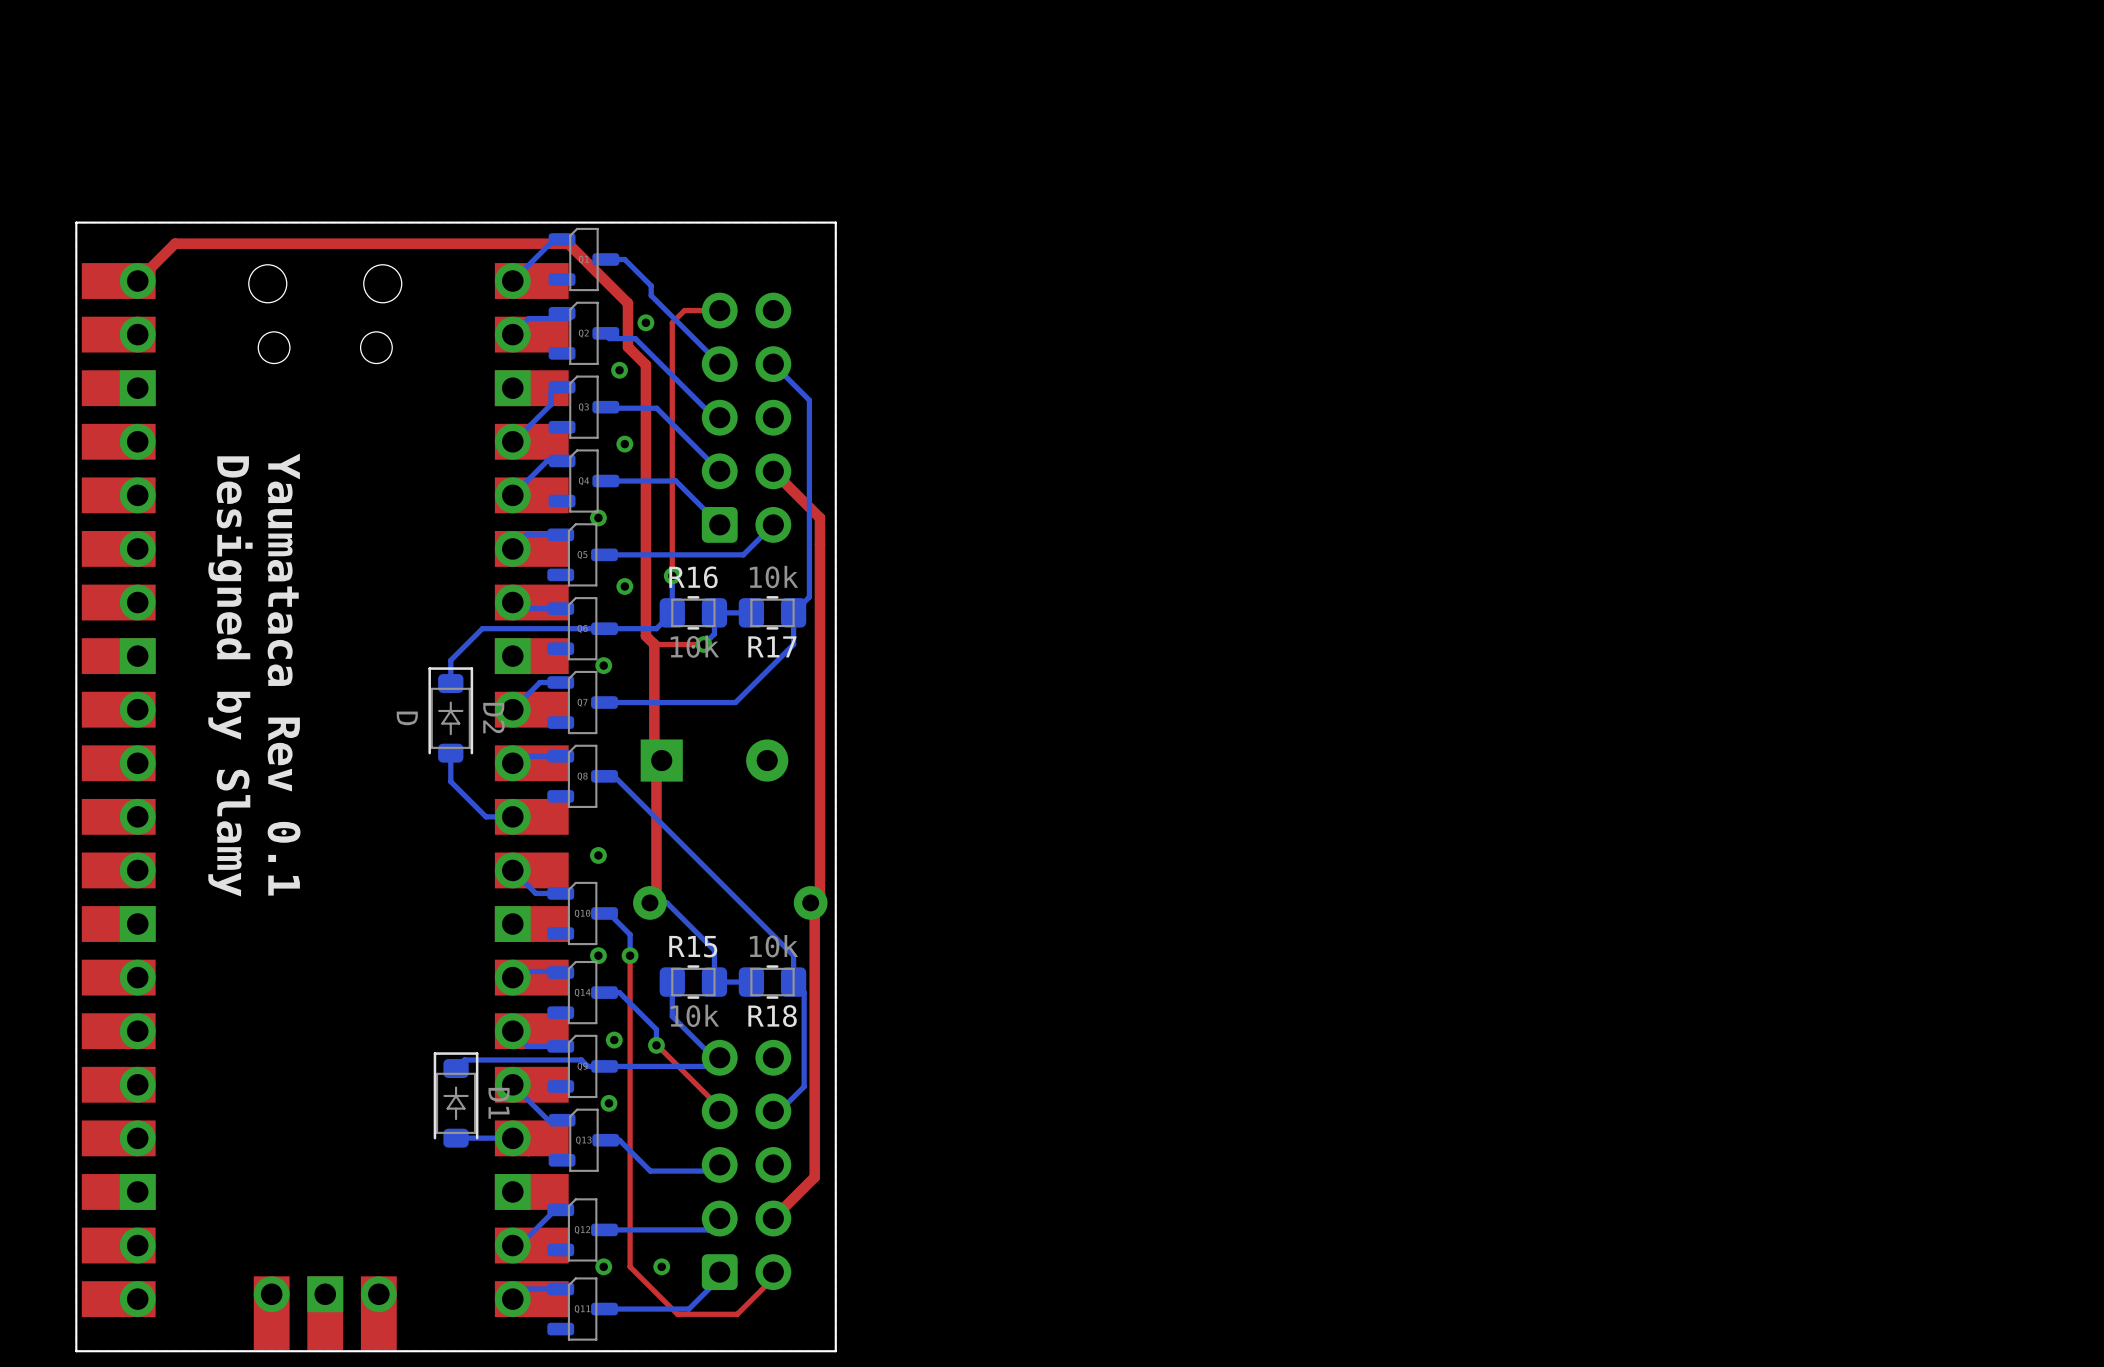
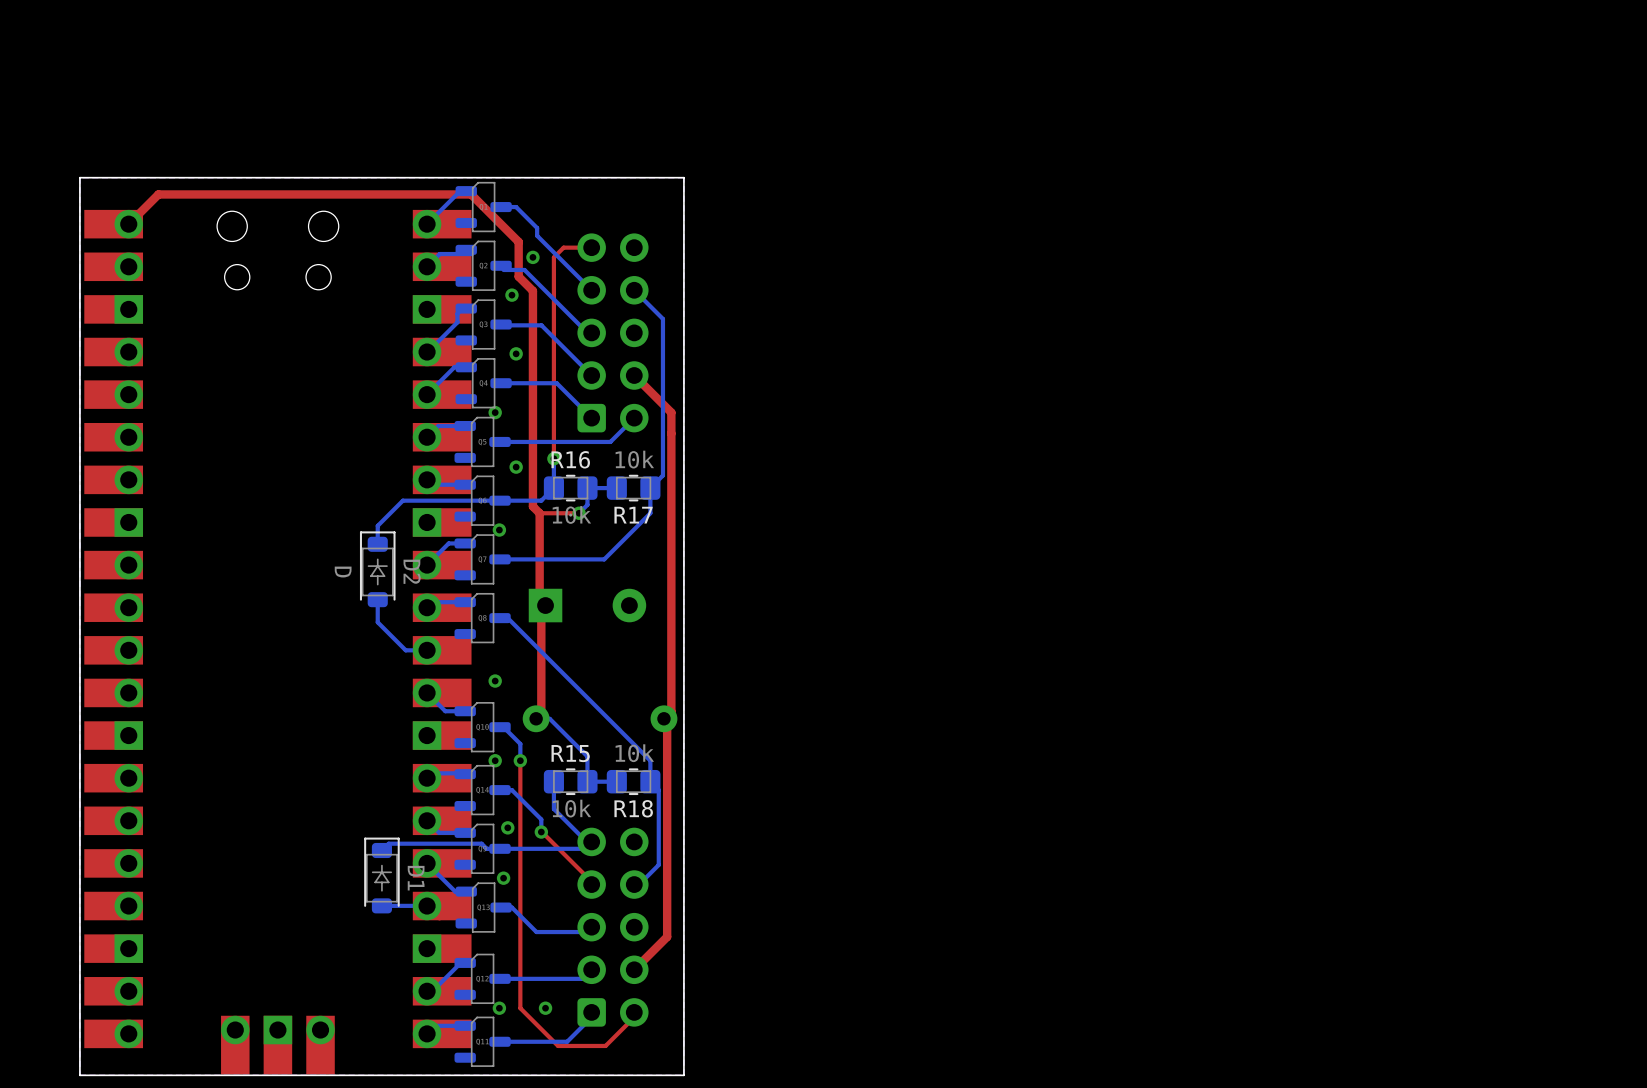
text: Yaumataca Rev 0.1 (284, 674) -> none
text: Designed by Slamy (230, 676) -> none

